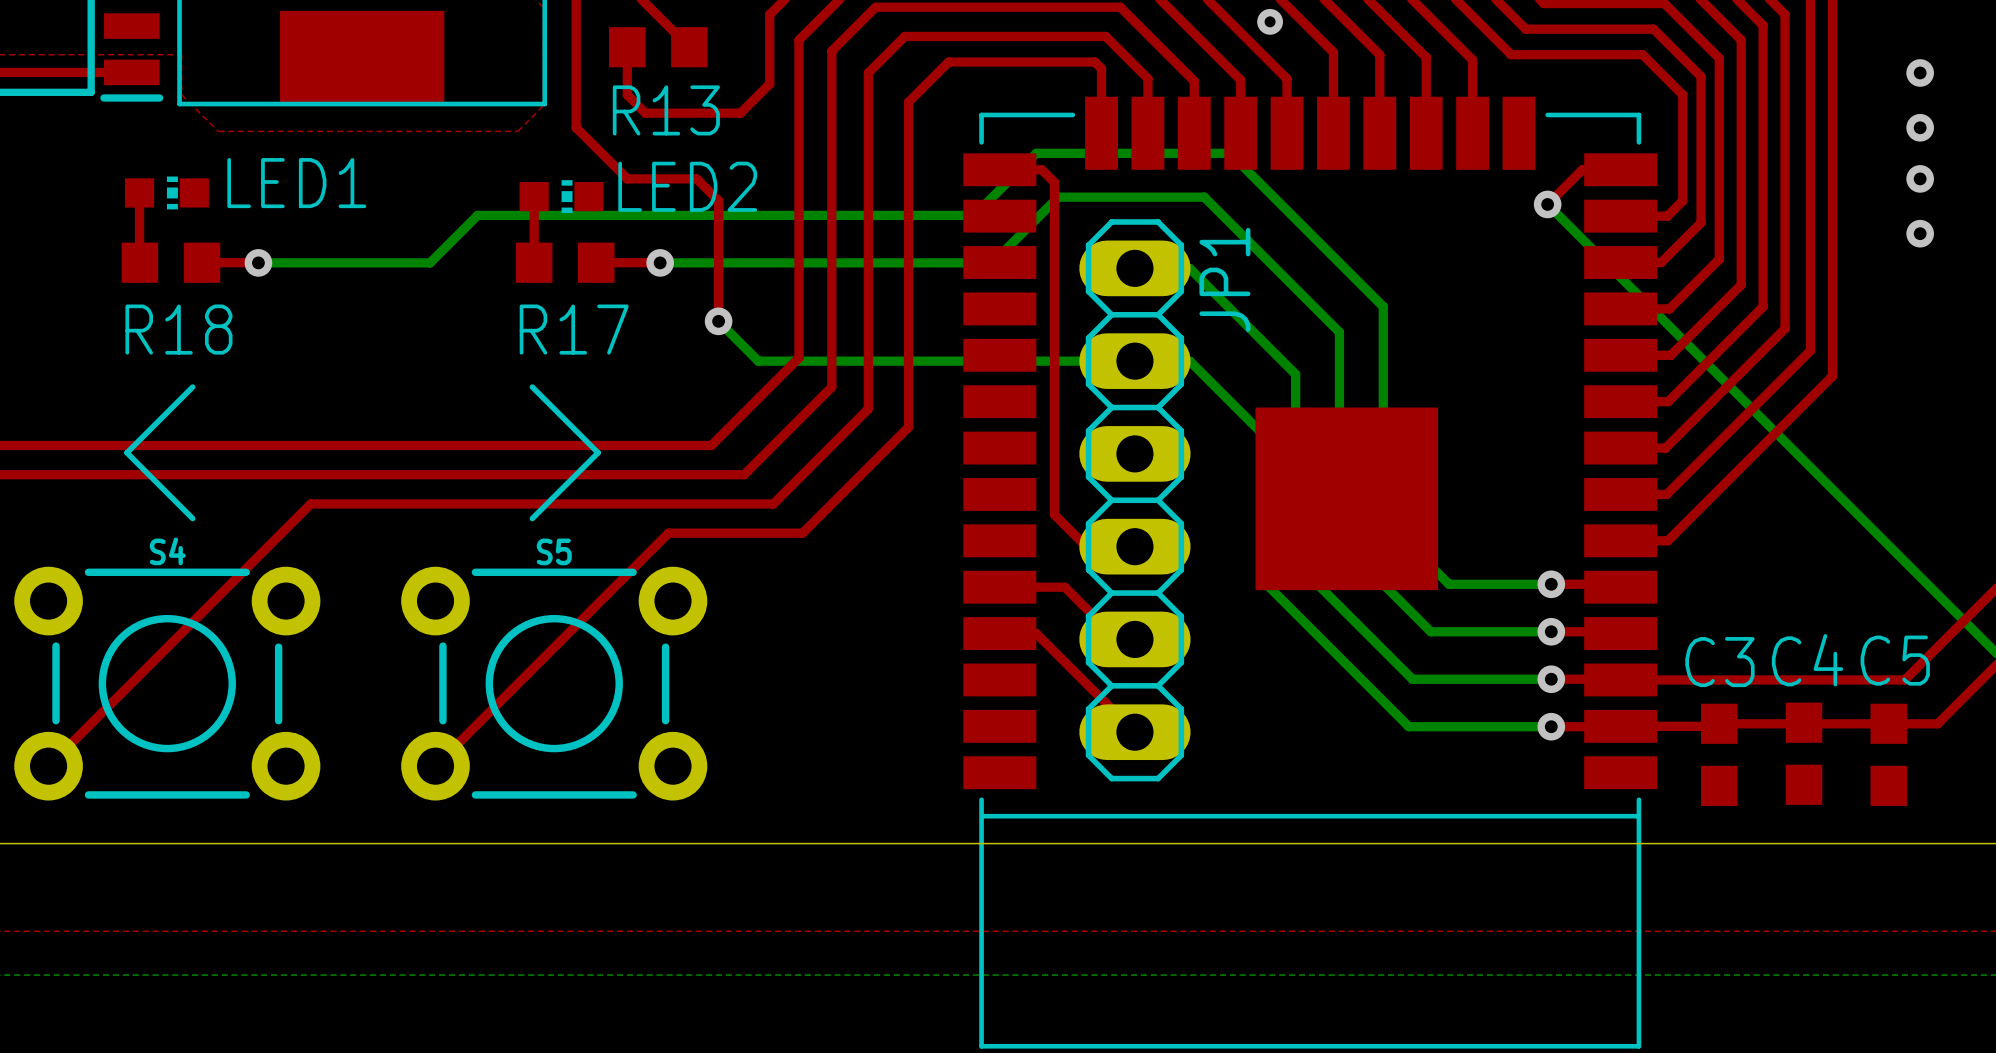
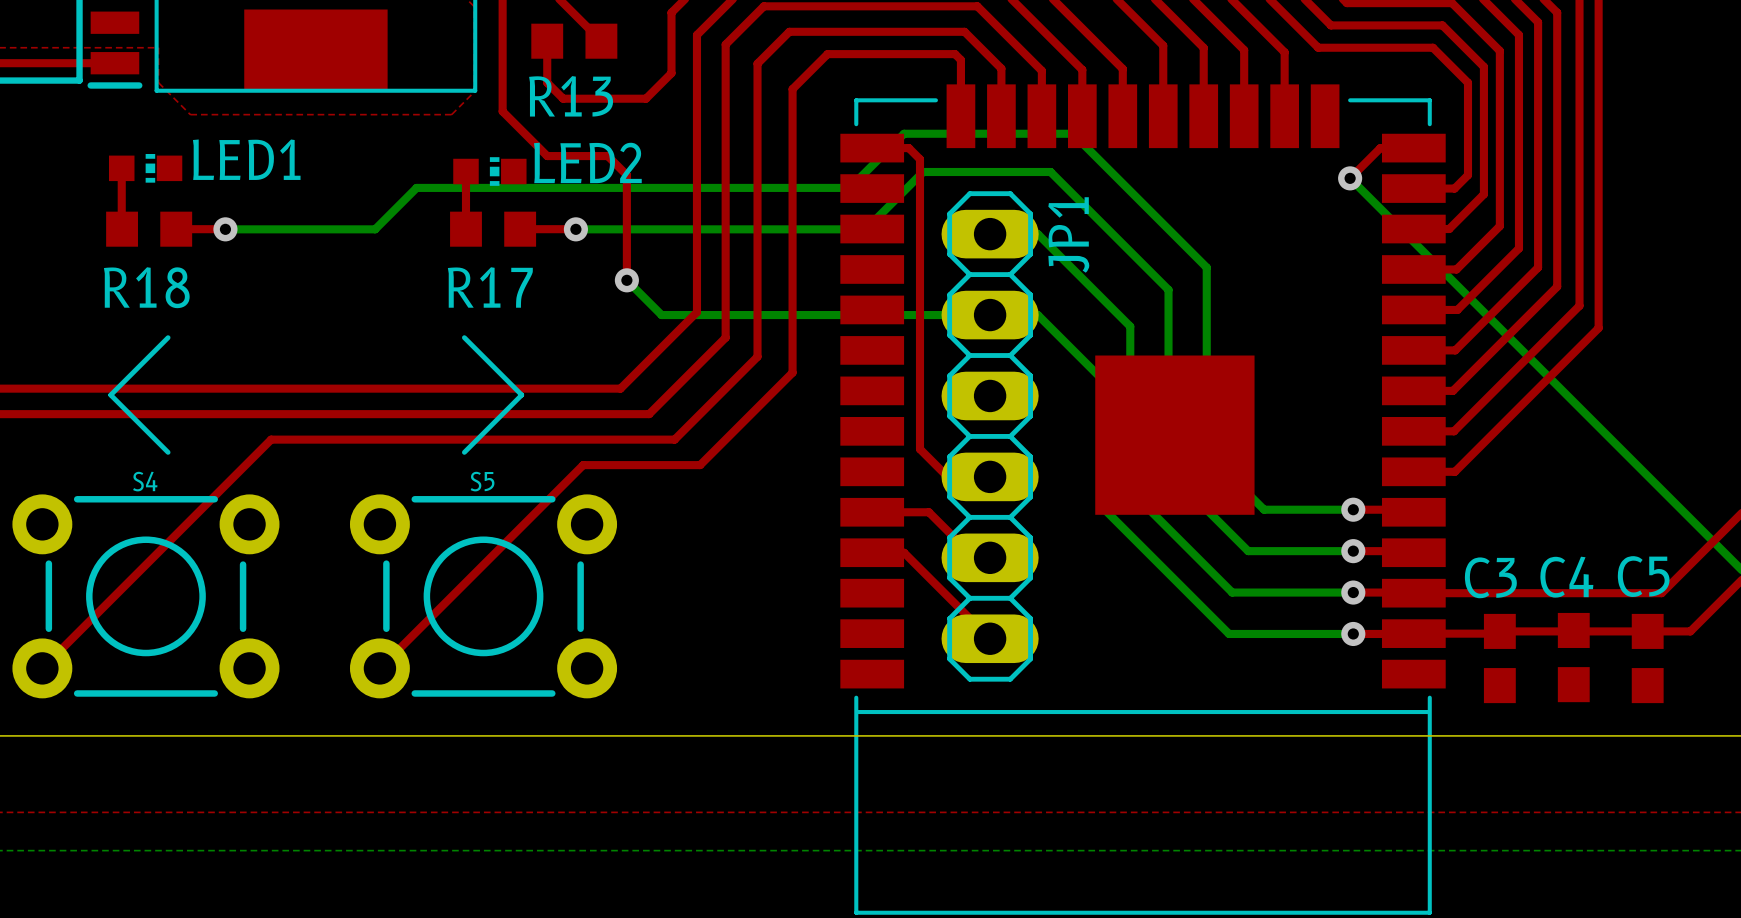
via: (1270, 21) -> none
via: (1920, 72) -> none
via: (1920, 127) -> none
via: (1920, 178) -> none
via: (1920, 233) -> none

